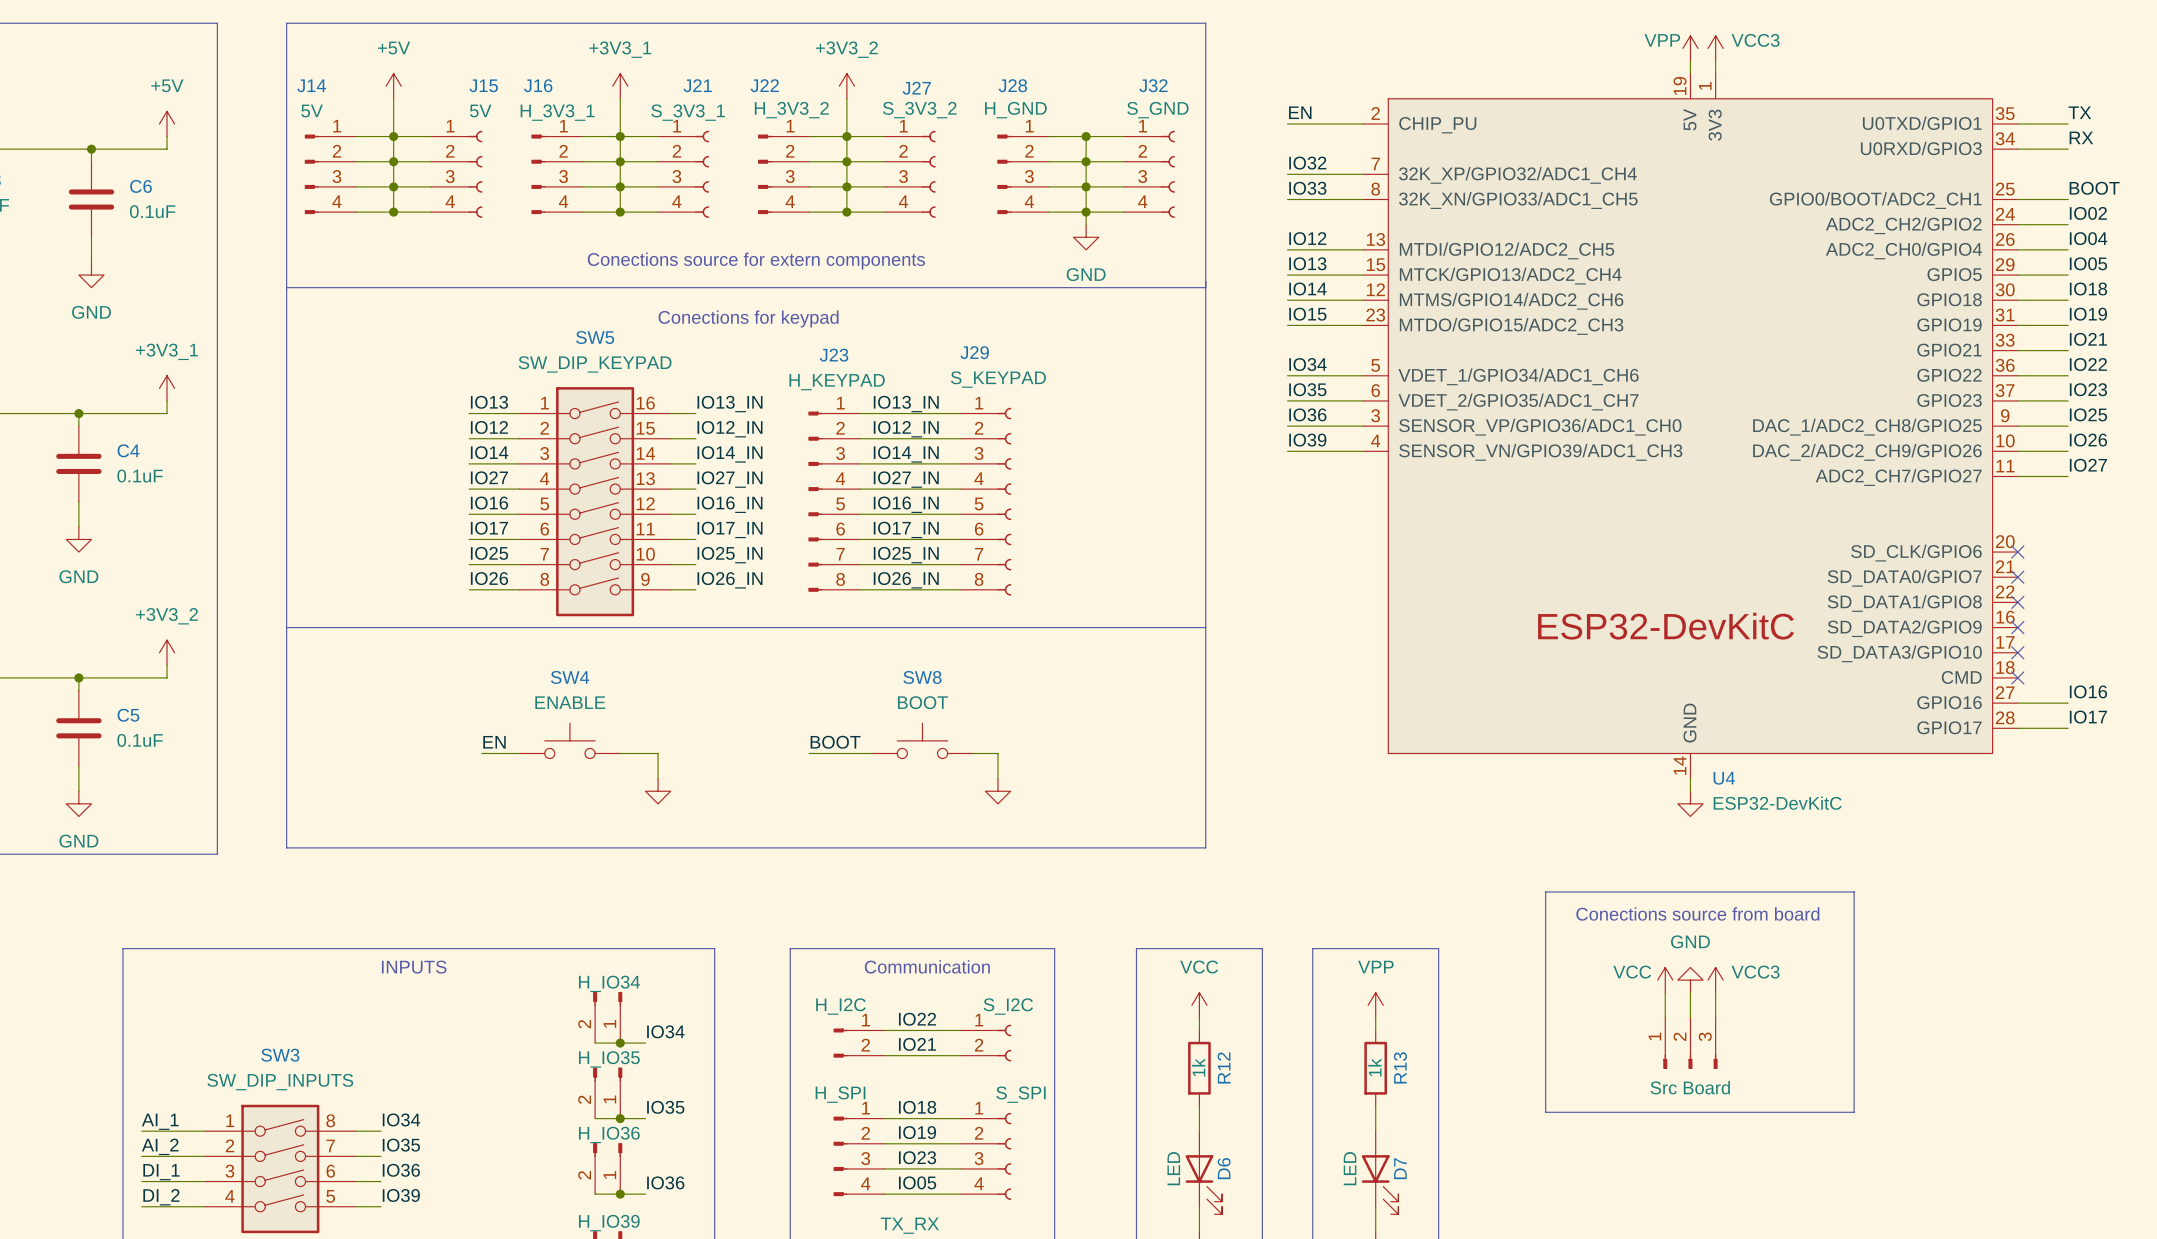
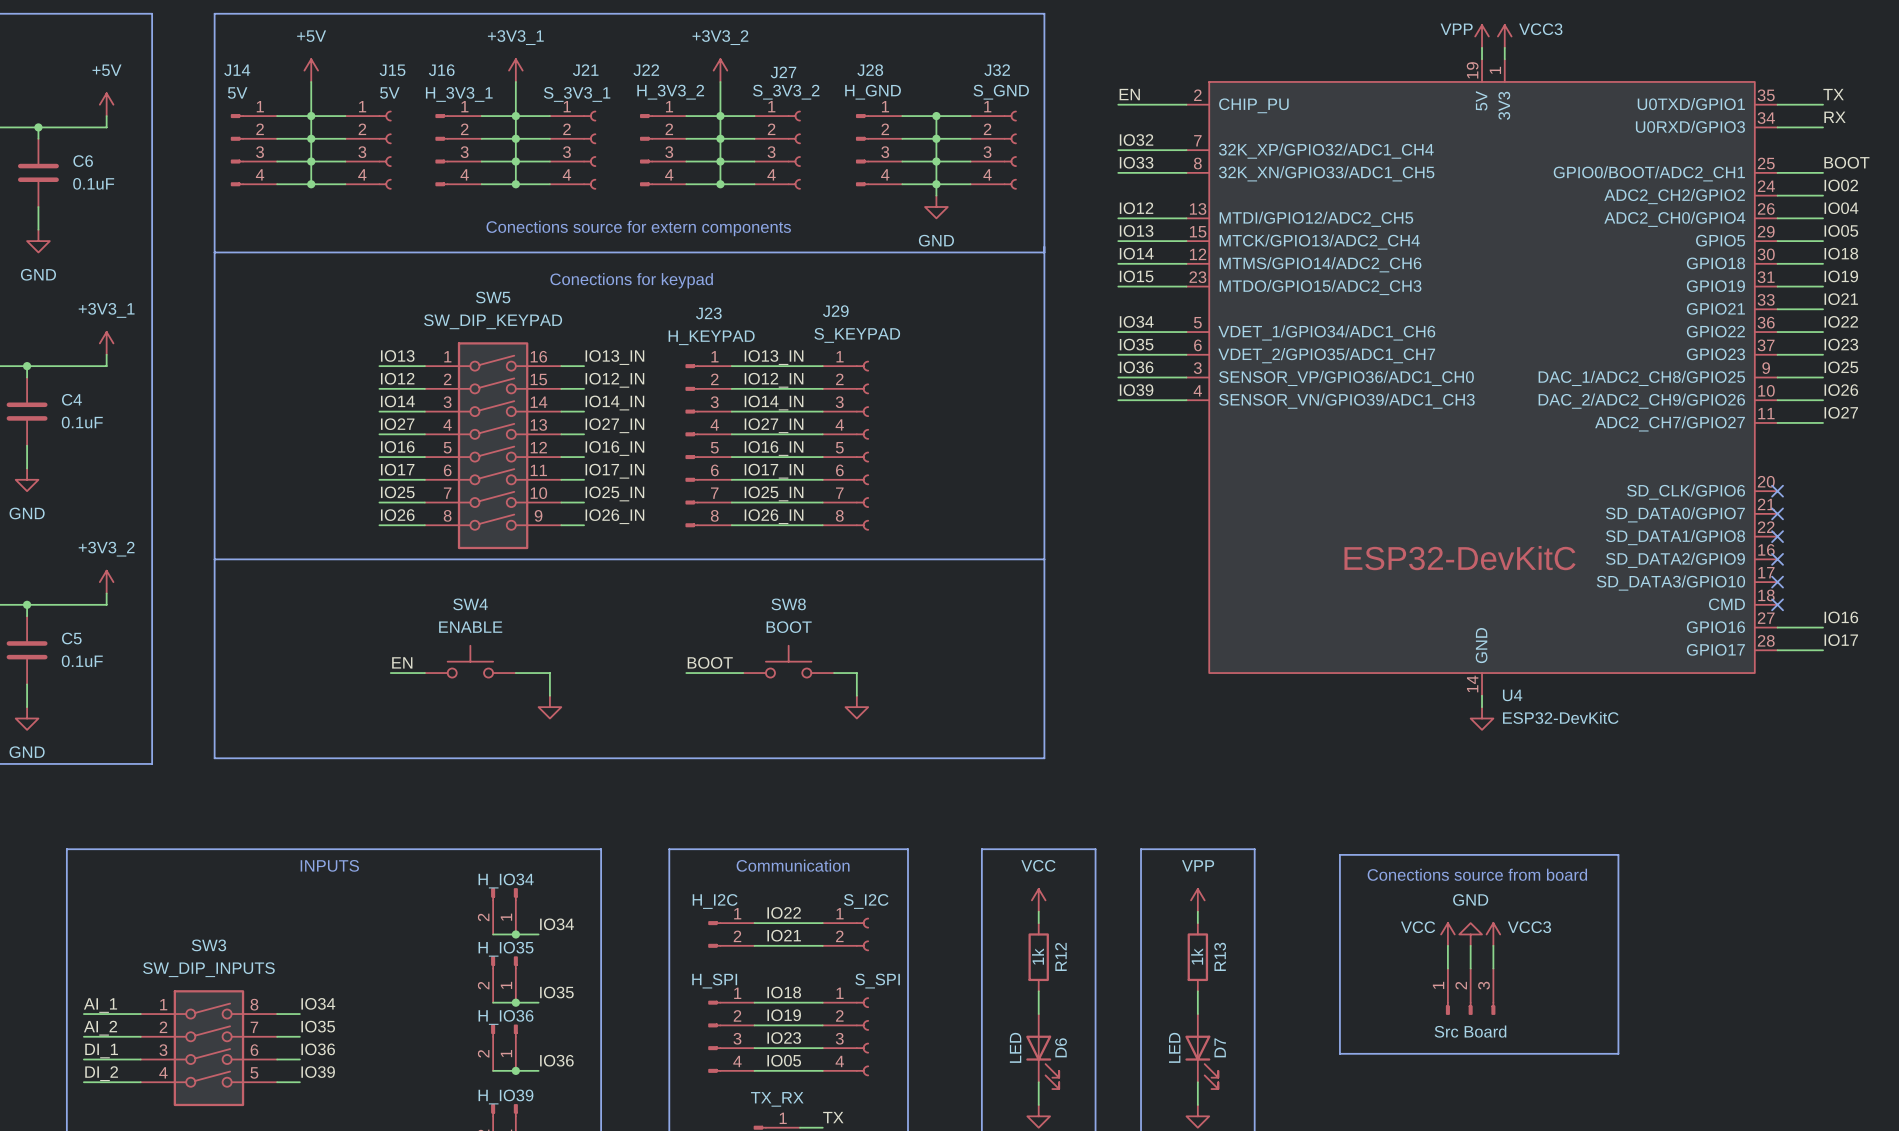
line: (1545, 891) (1854, 891) (1854, 1112) (1545, 1112) (1545, 891) -> (1339, 854) (1339, 1053) (1618, 1053) (1618, 854) (1339, 854)
text position: Conections source from board (1697, 913) -> Conections source from board (1477, 874)
power symbol position: VCC (1665, 980) -> VCC (1447, 934)
power symbol position: GND (1690, 980) -> GND (1470, 934)
power symbol position: VCC3 (1715, 980) -> VCC3 (1493, 934)
wire: (1665, 992) (1665, 1017) -> (1447, 945) (1447, 968)
wire: (1690, 992) (1690, 1017) -> (1470, 945) (1470, 968)
wire: (1715, 992) (1715, 1017) -> (1493, 945) (1493, 968)
part position: (1690, 1043) -> (1470, 991)

